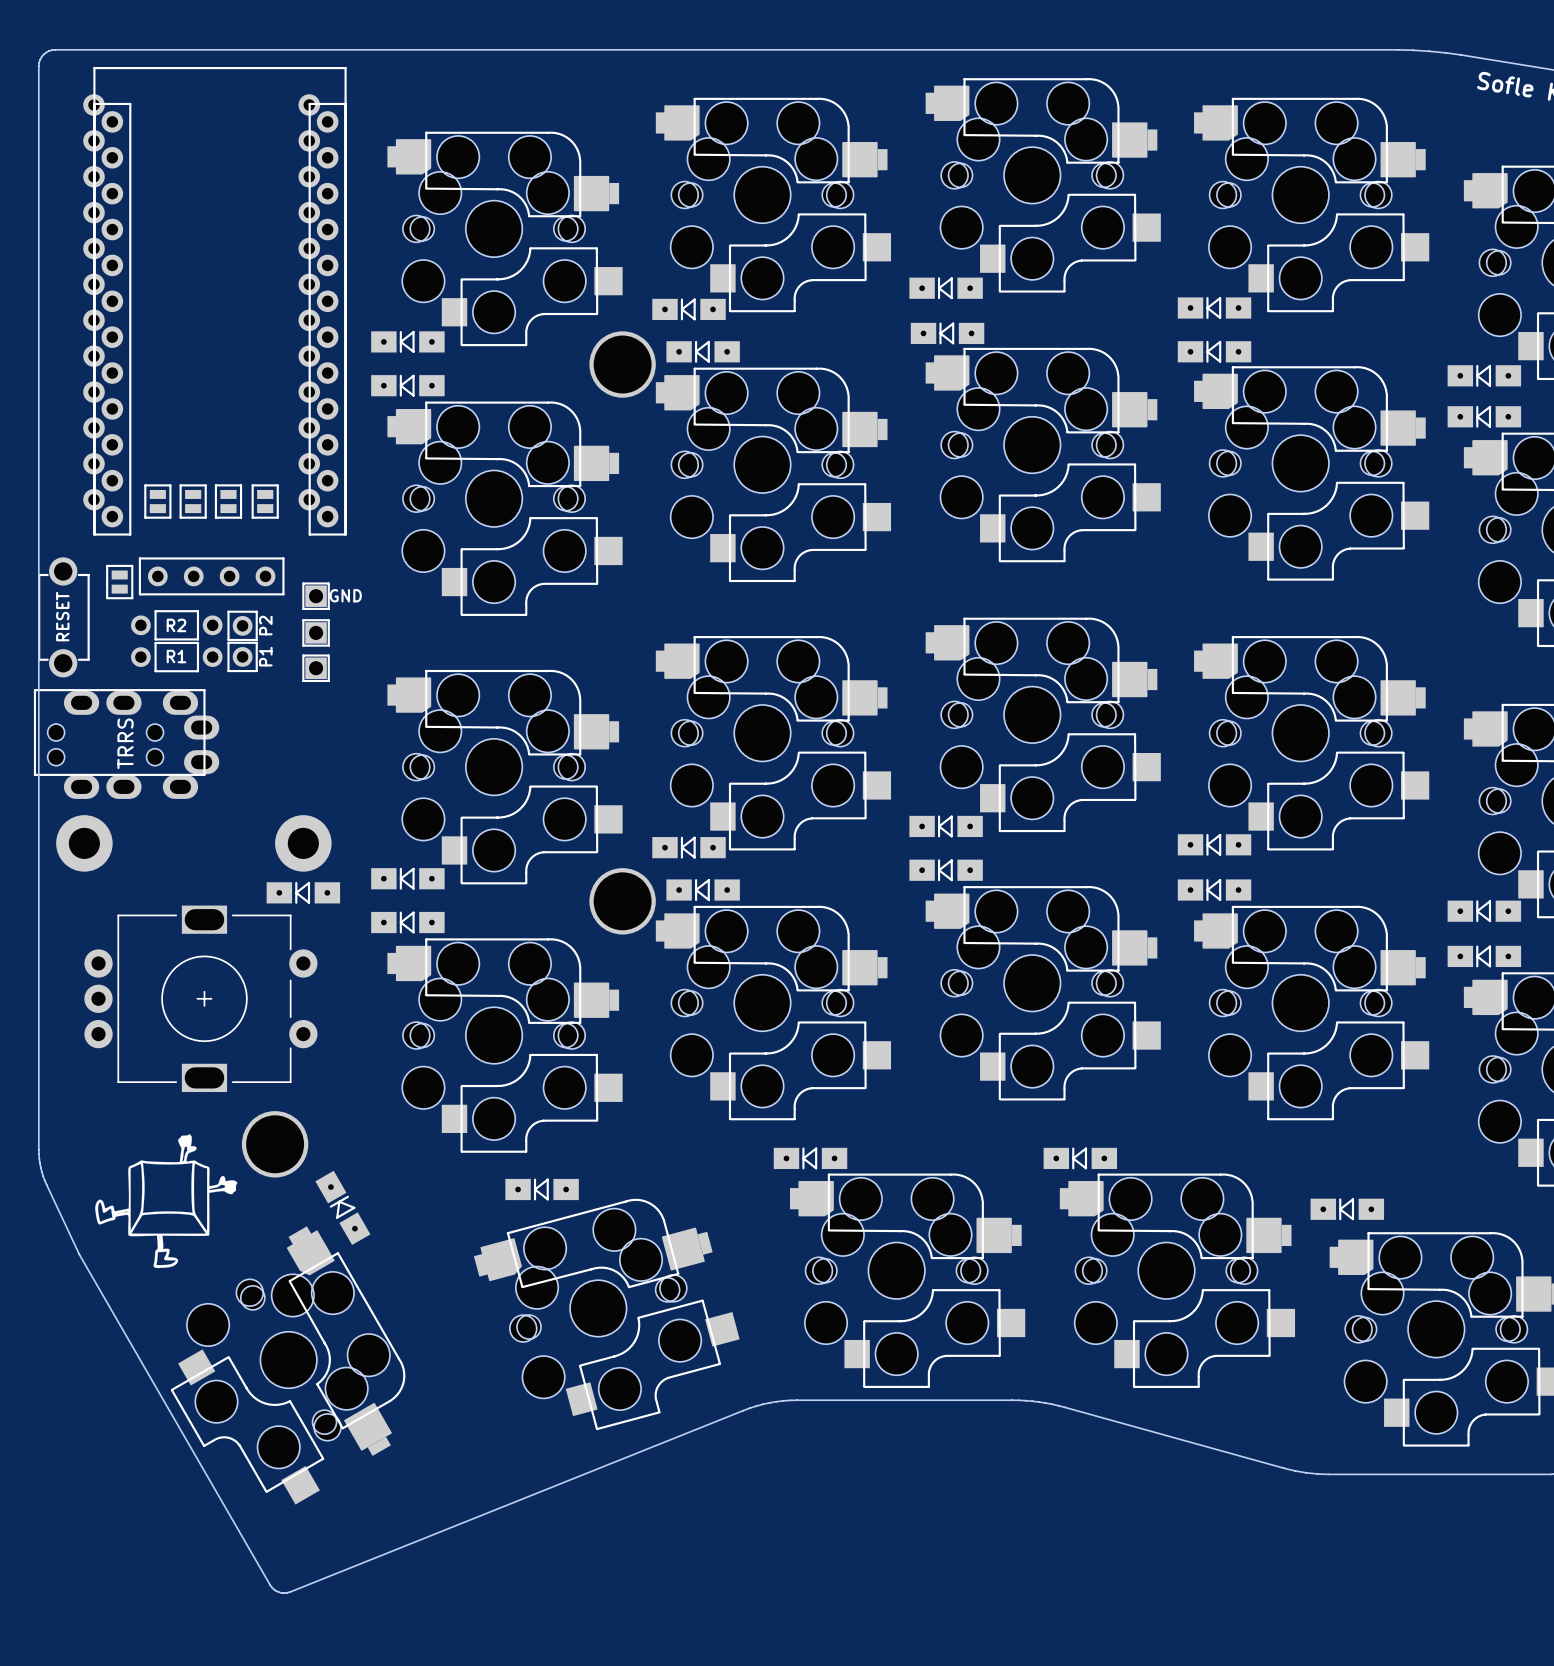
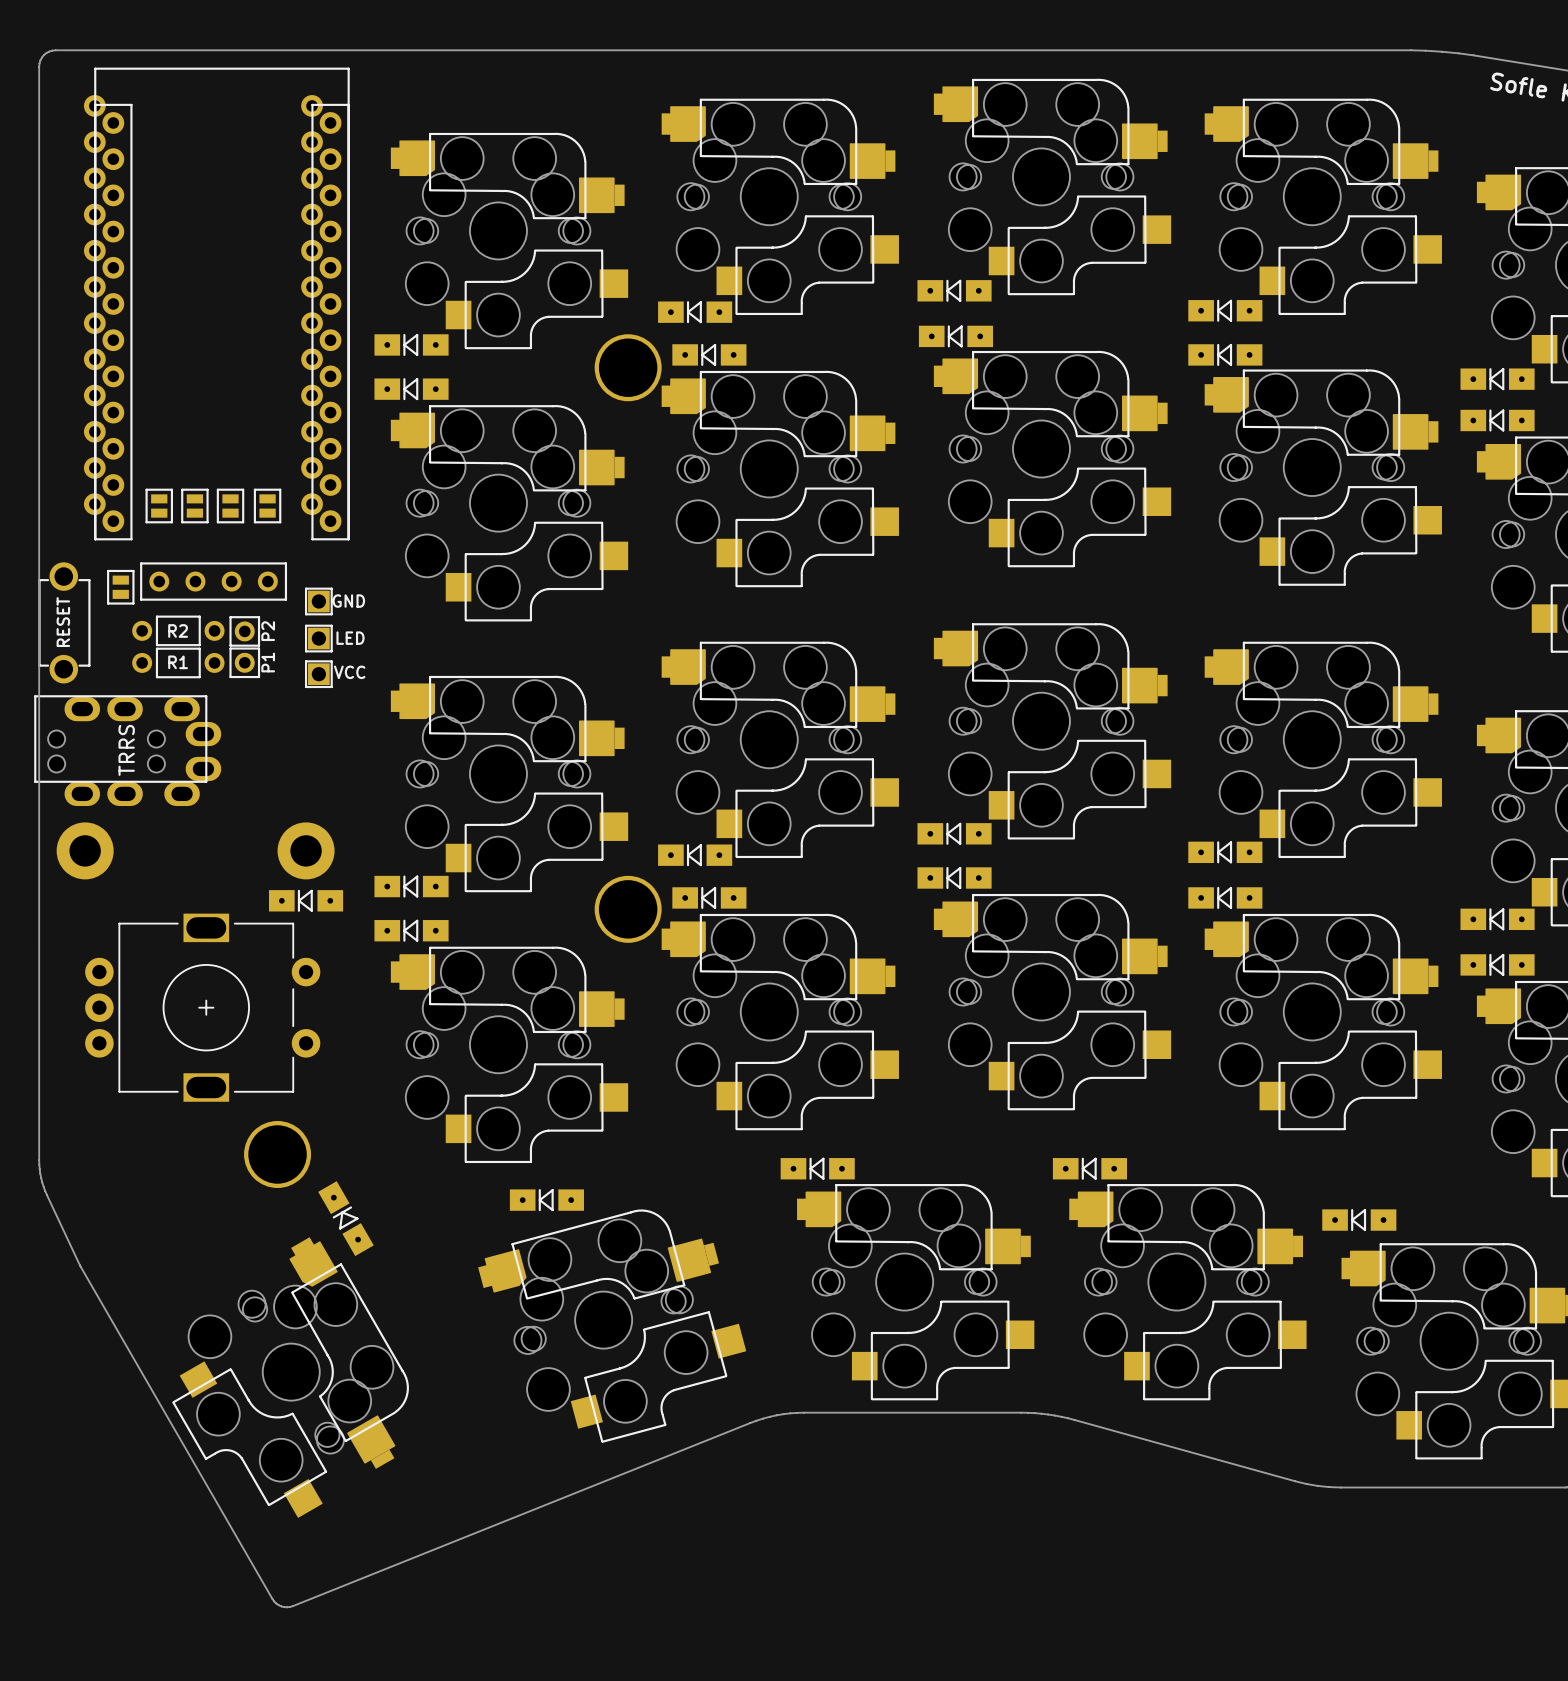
part text: none -> LED (350, 638)
part text: none -> VCC (349, 672)
drawing: [95, 1134, 238, 1269] -> none

